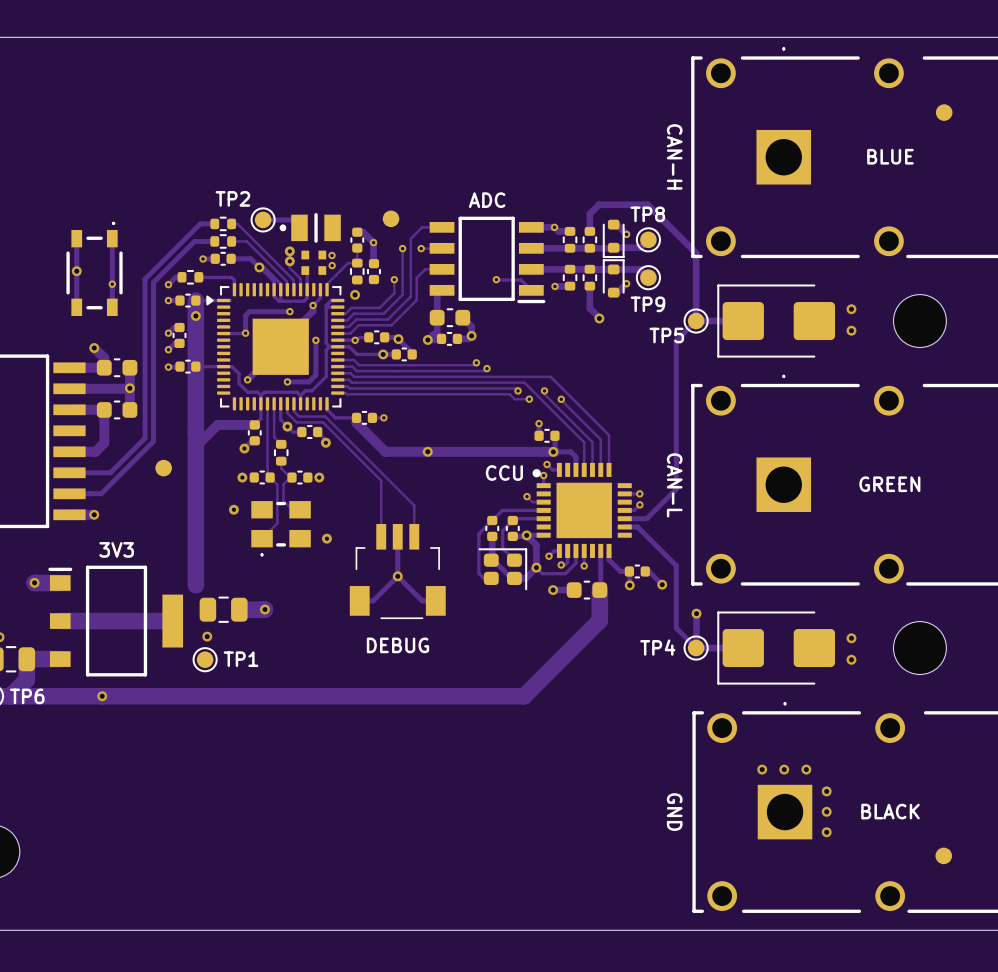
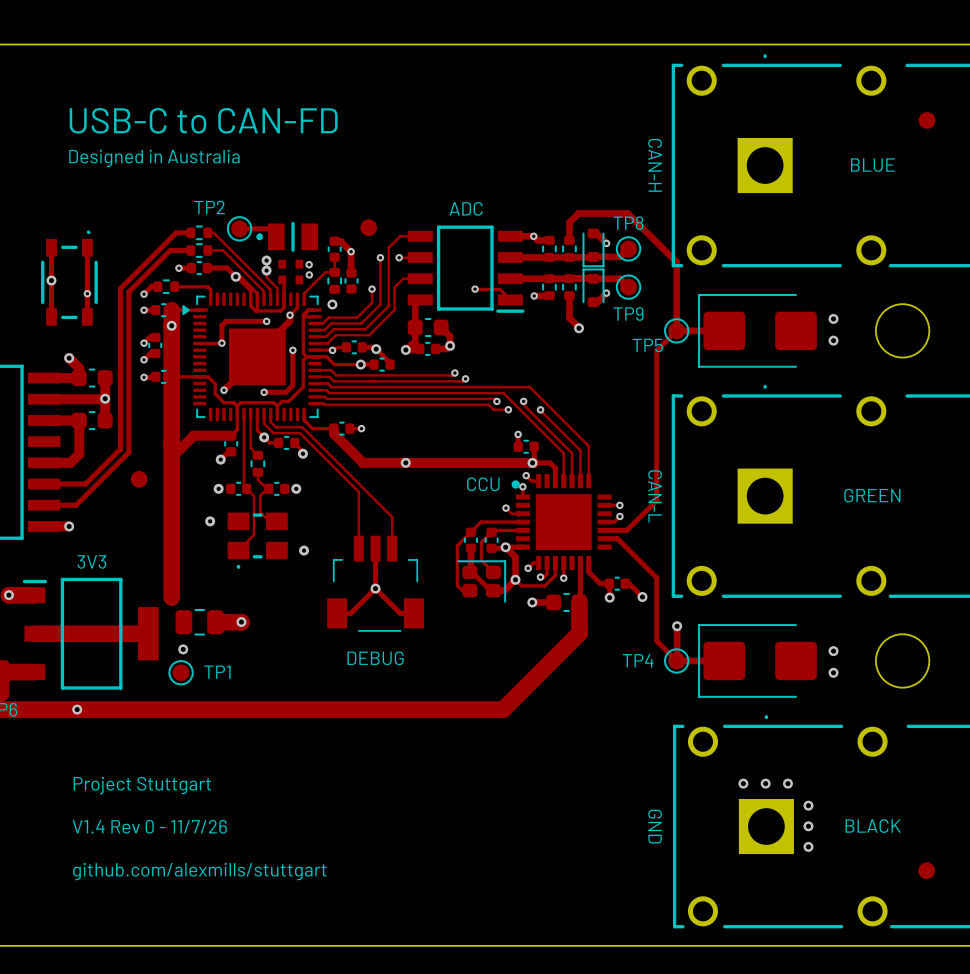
text: none -> USB-C to CAN-FD (203, 120)
text: none -> Designed in Australia (154, 158)
text: none -> Project Stuttgart (142, 785)
text: none -> V1.4 Rev 0 - 11/7/26 (149, 826)
text: none -> github.com/alexmills/stuttgart (199, 871)

